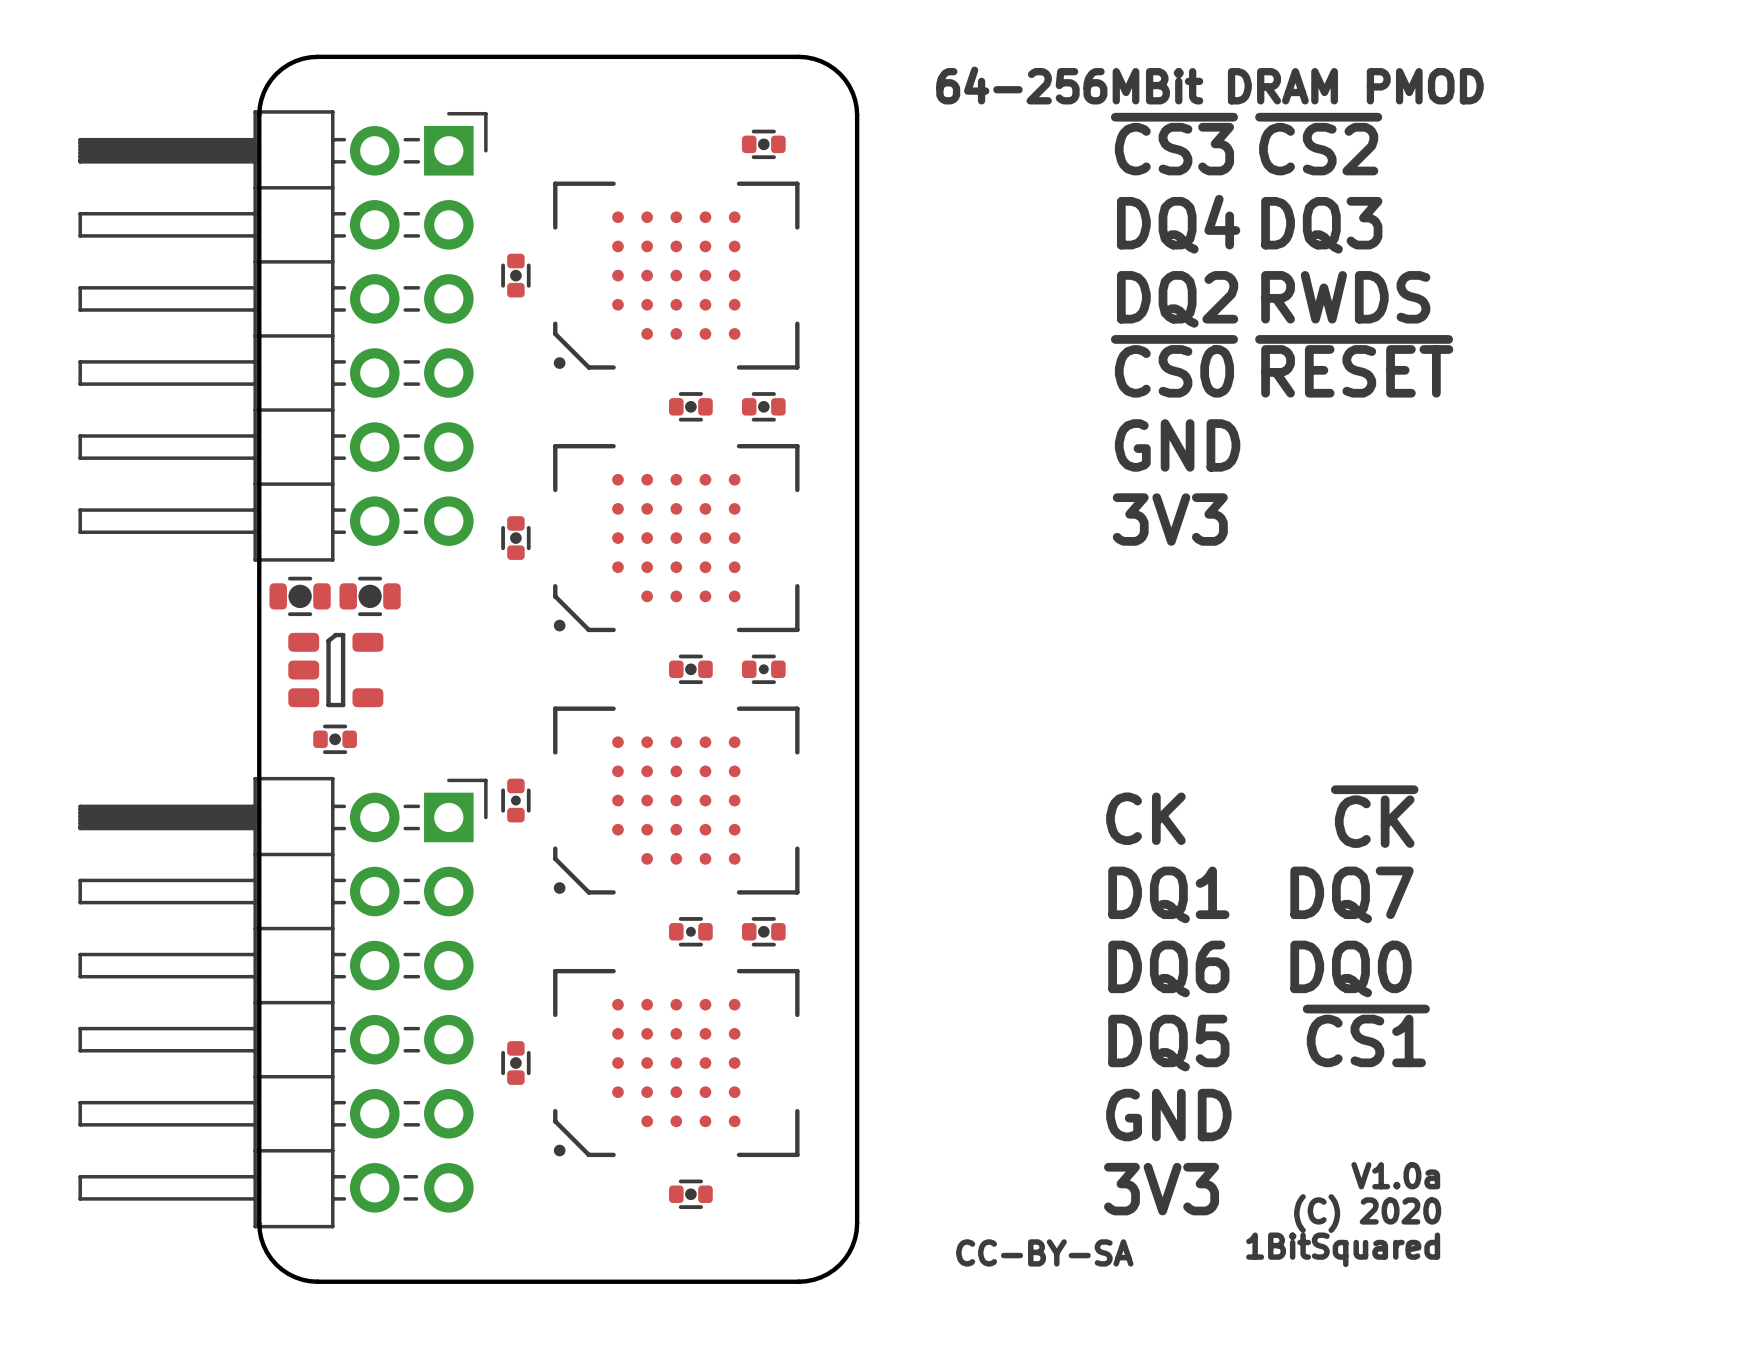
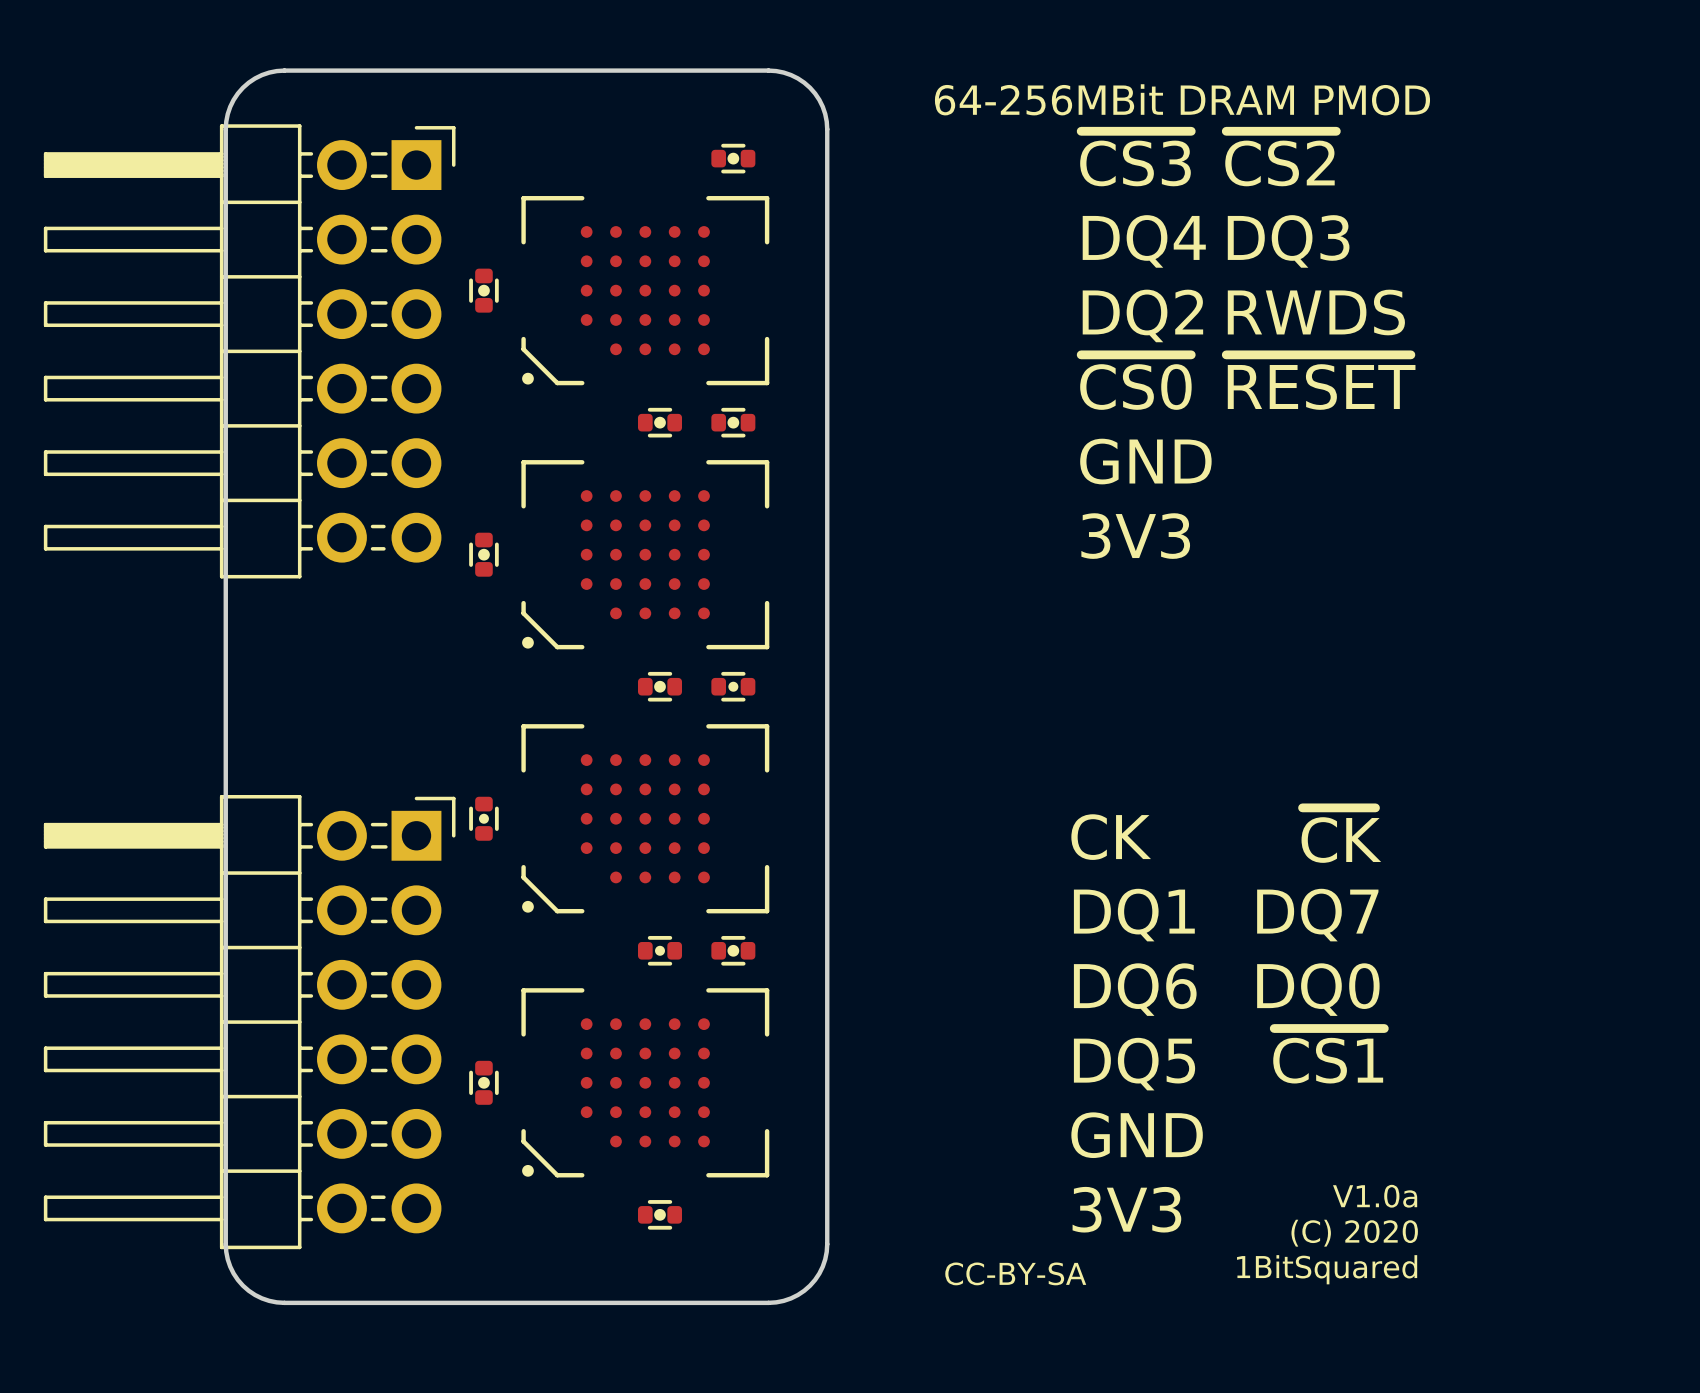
part: (300, 596) -> none
part: (370, 596) -> none
part: (335, 670) -> none
part: (335, 739) -> none

